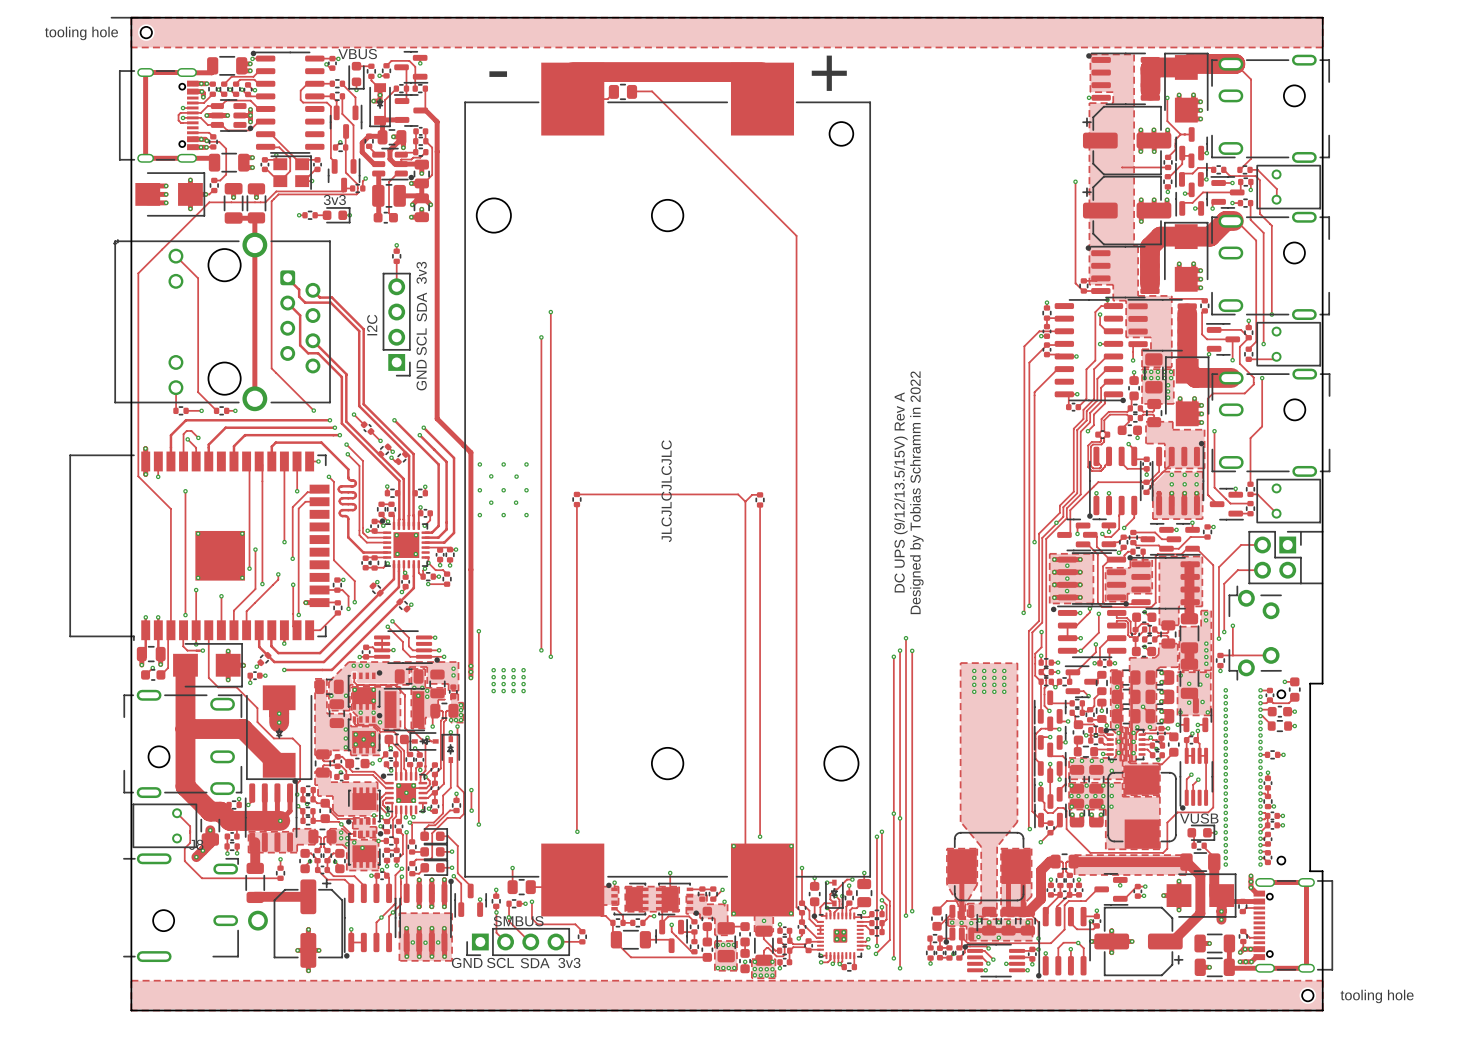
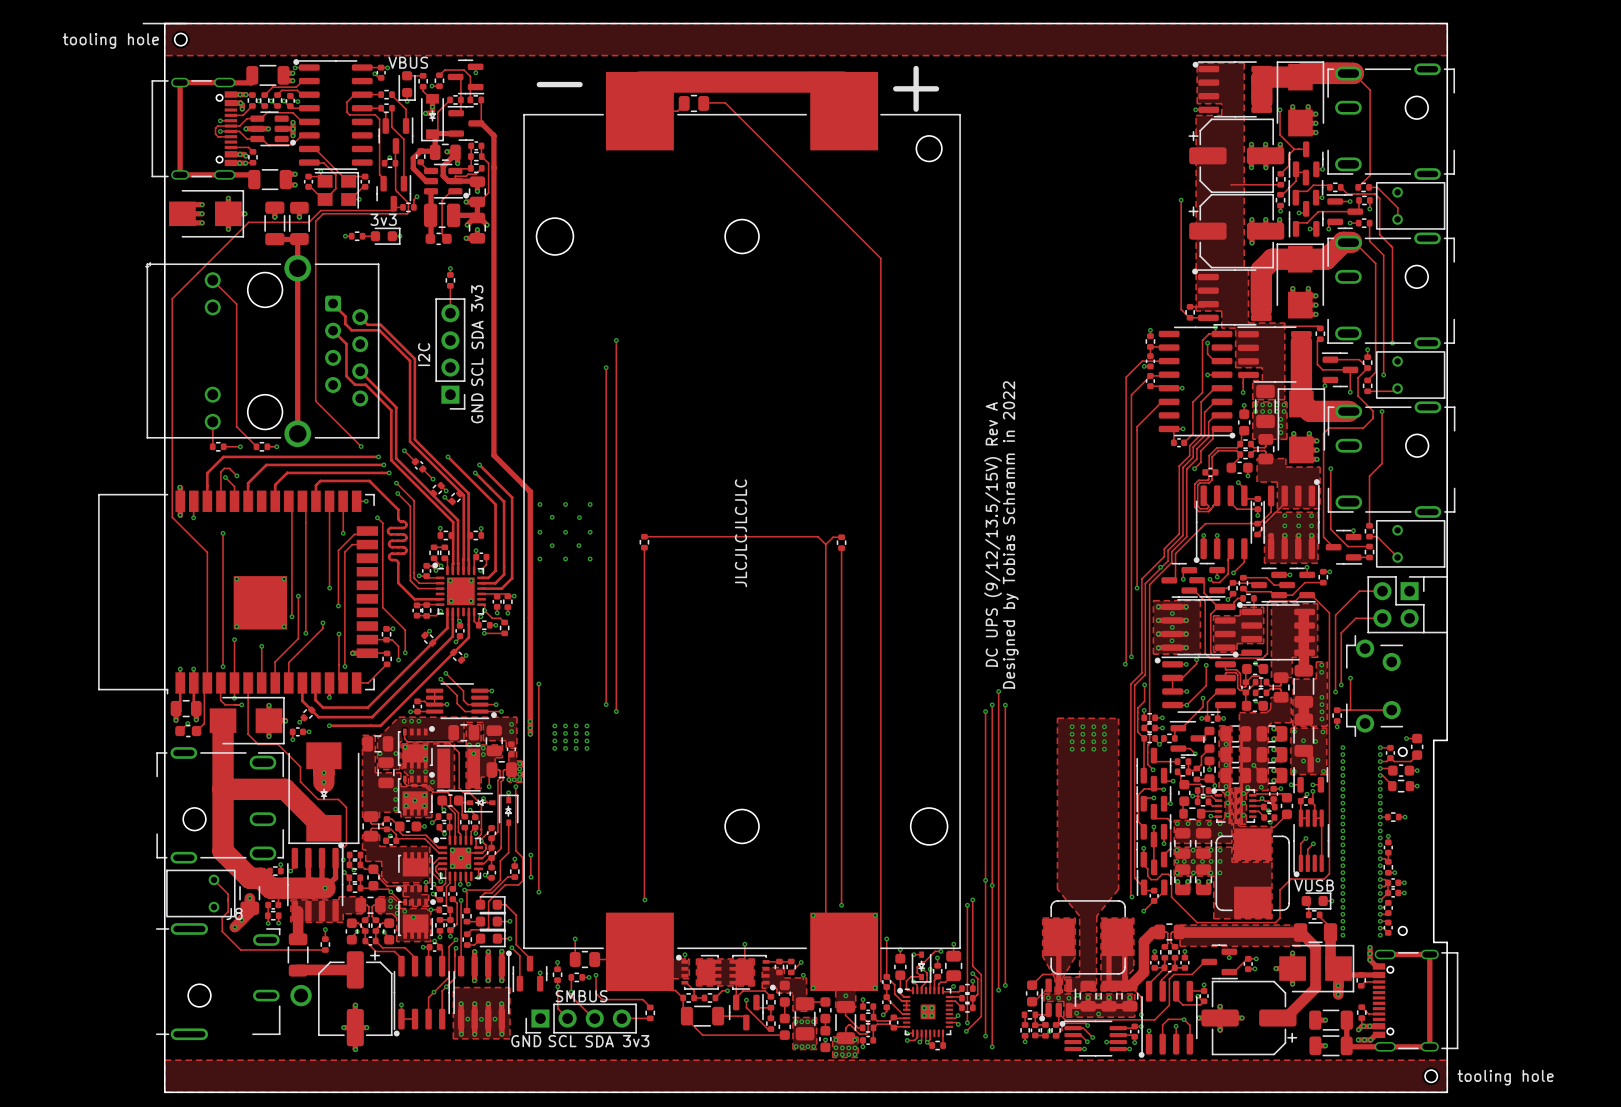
track: (206, 140) (219, 141) (226, 148) (226, 174) (220, 180) (214, 180) -> none
part: (214, 185) -> none
track: (213, 190) (209, 194) (205, 194) -> none

